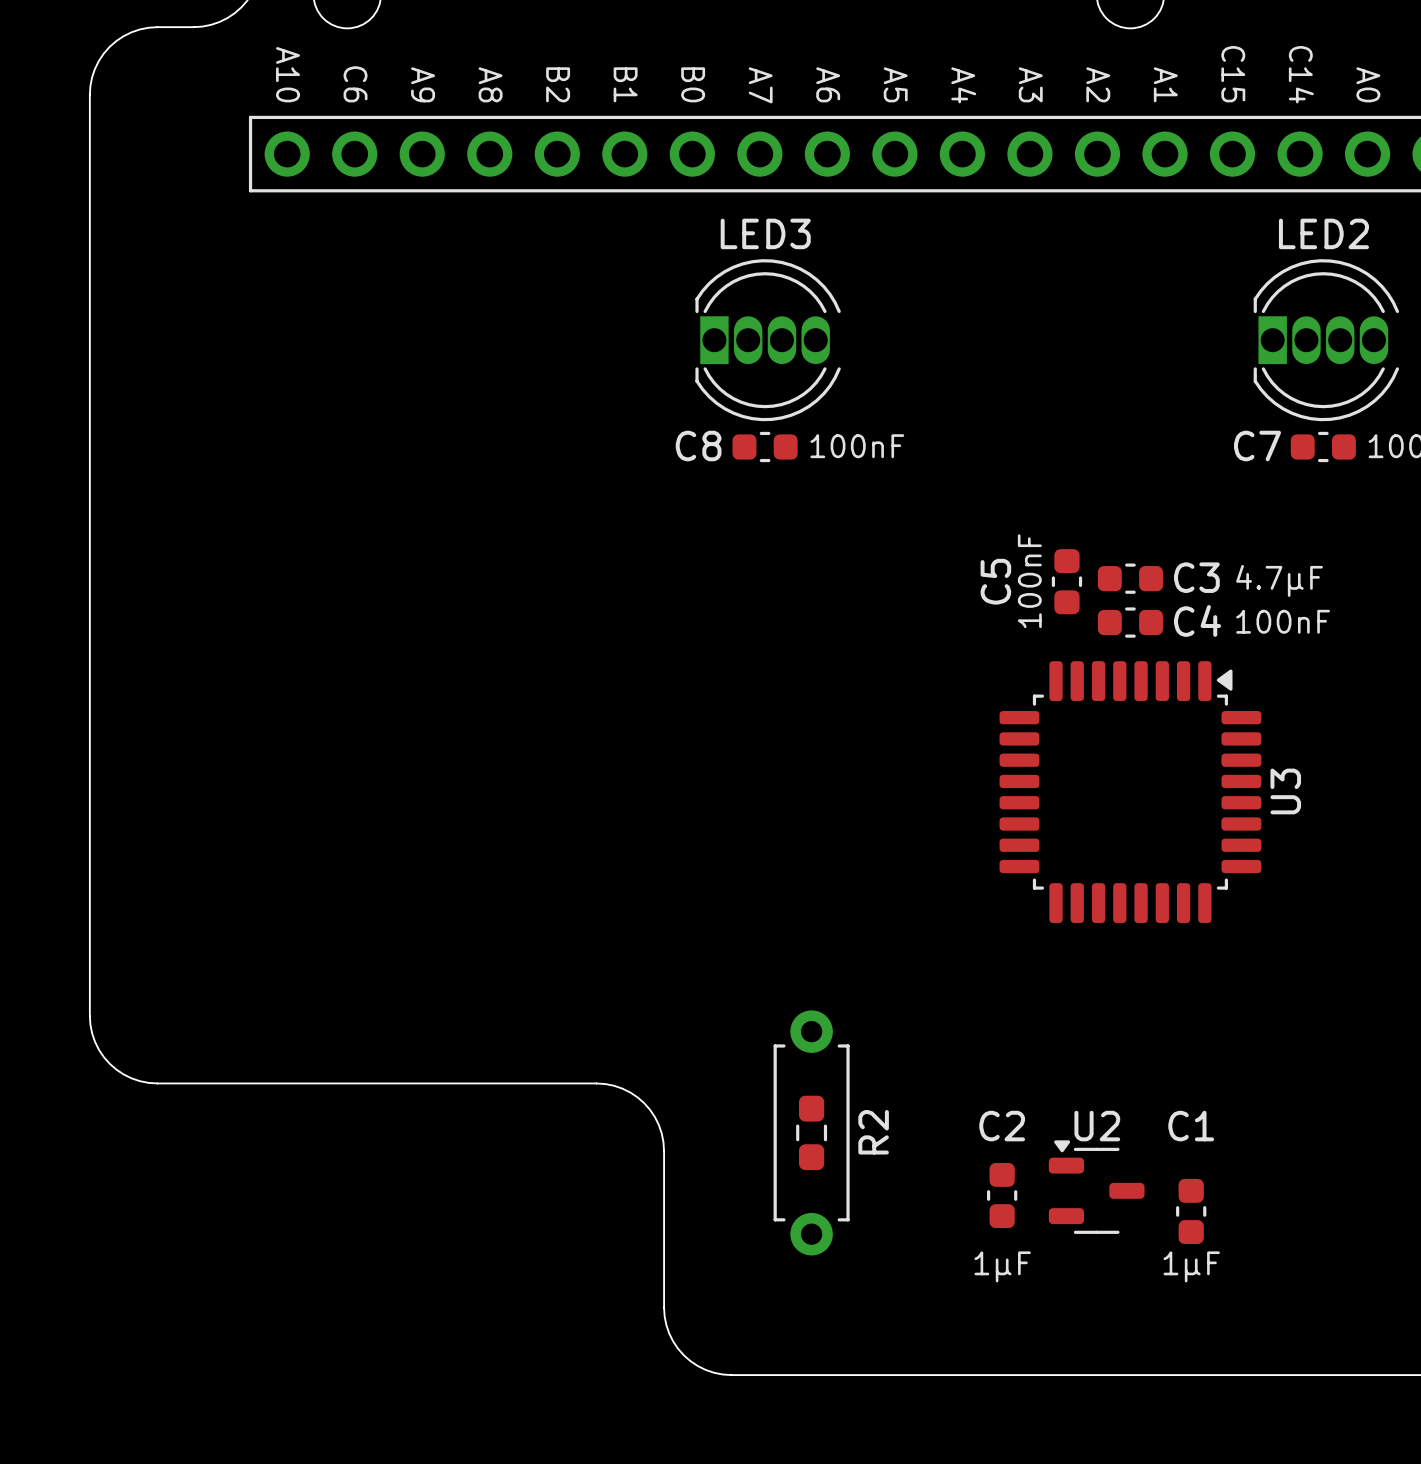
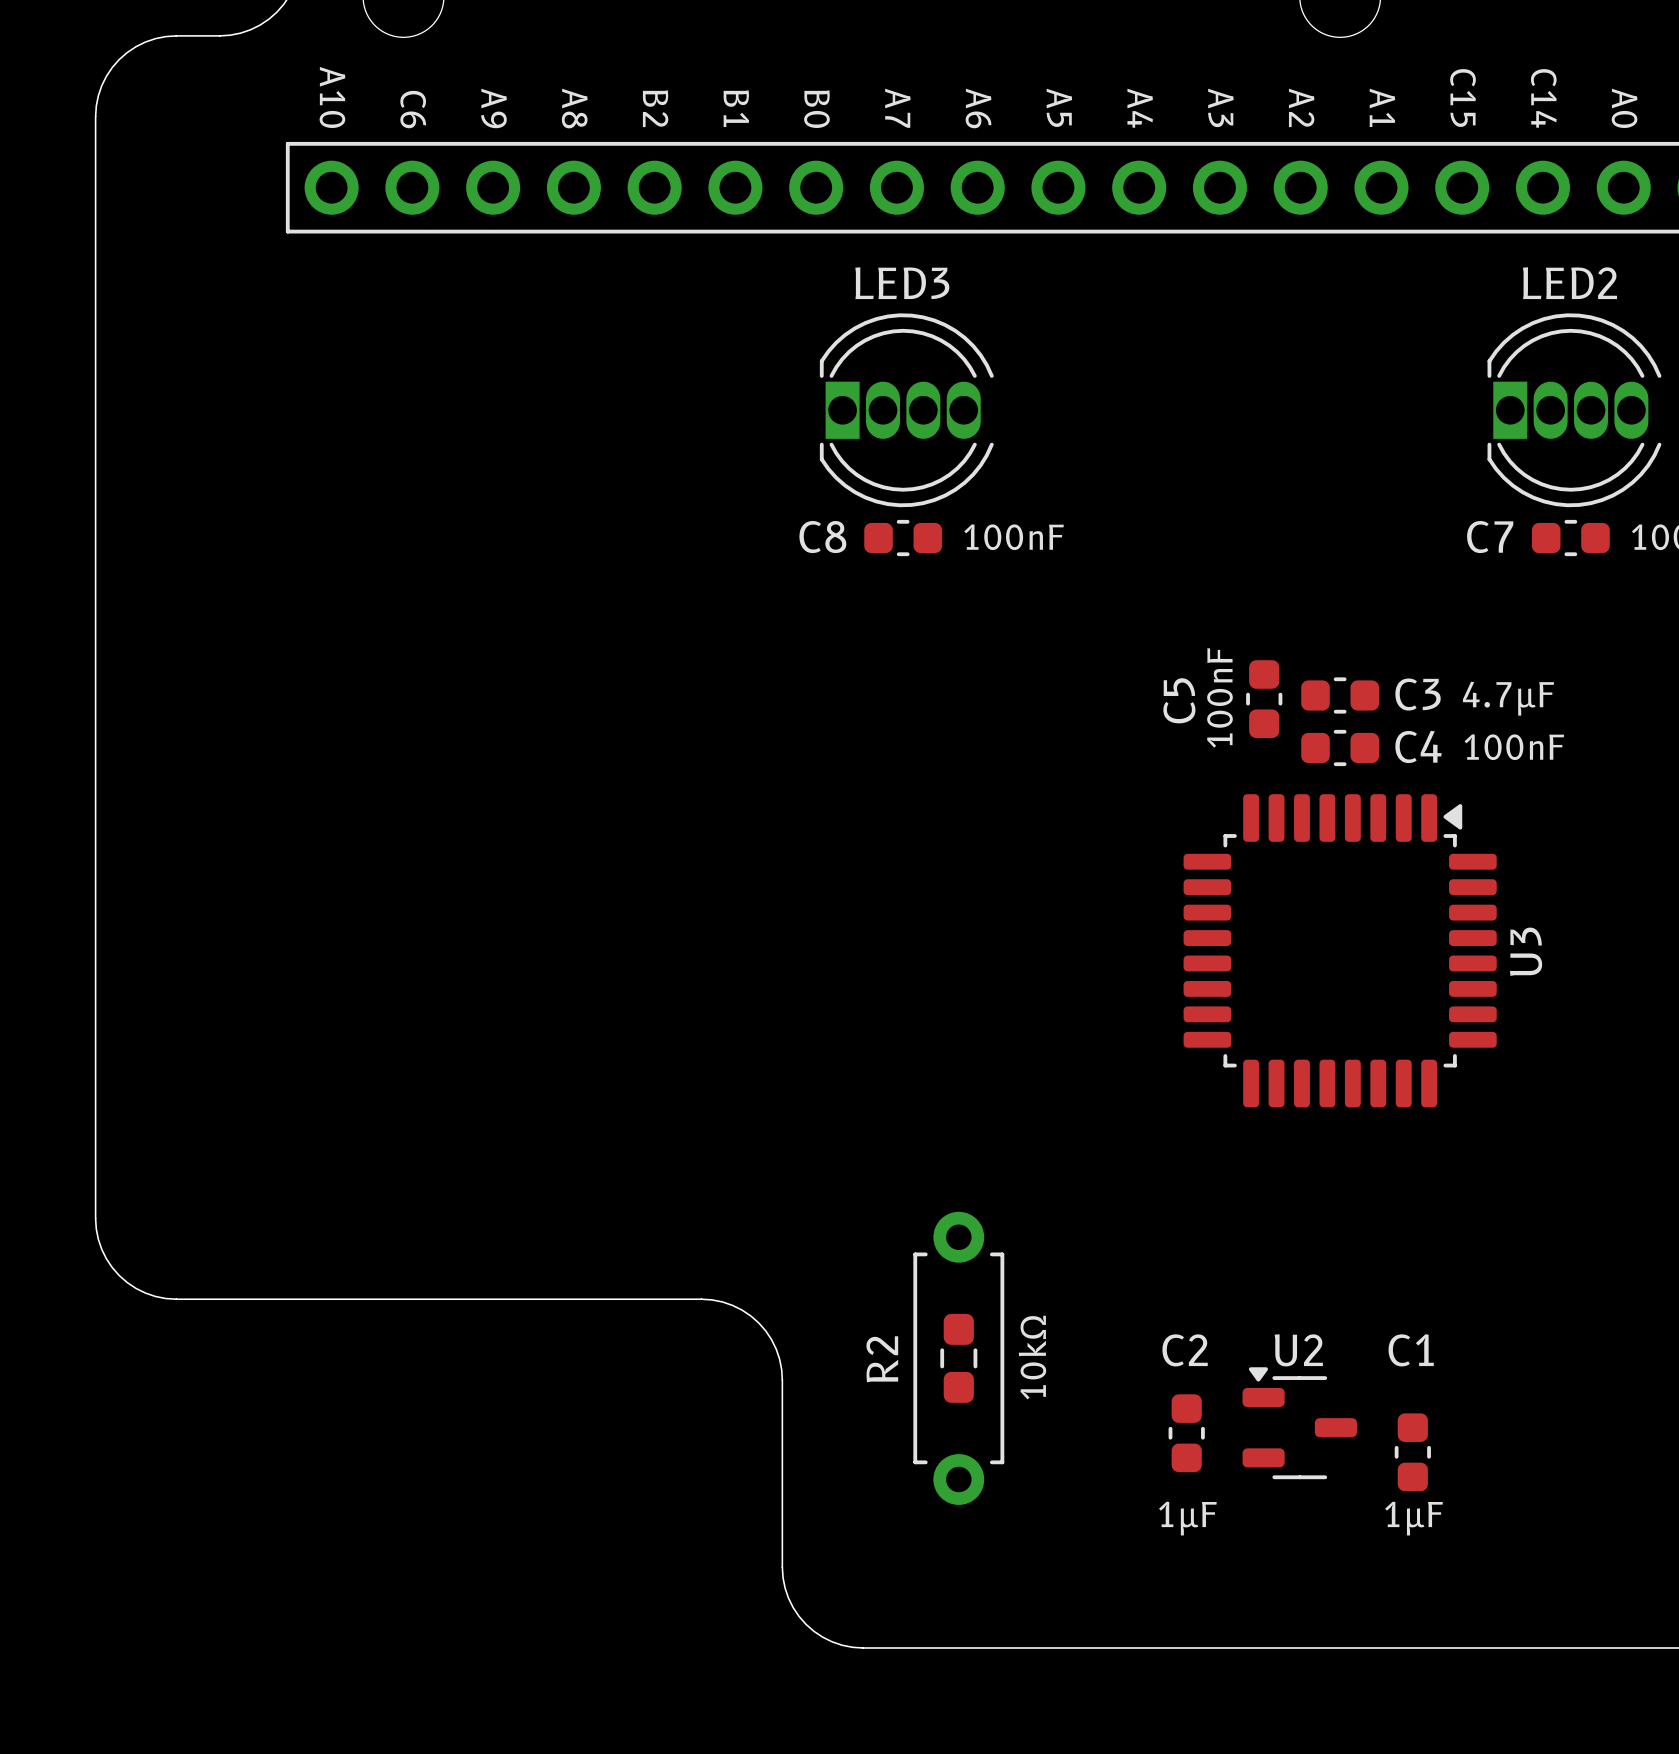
R2 name position: R2 (873, 1132) -> R2 (882, 1359)
R2 value: none -> 10kΩ (1032, 1357)

